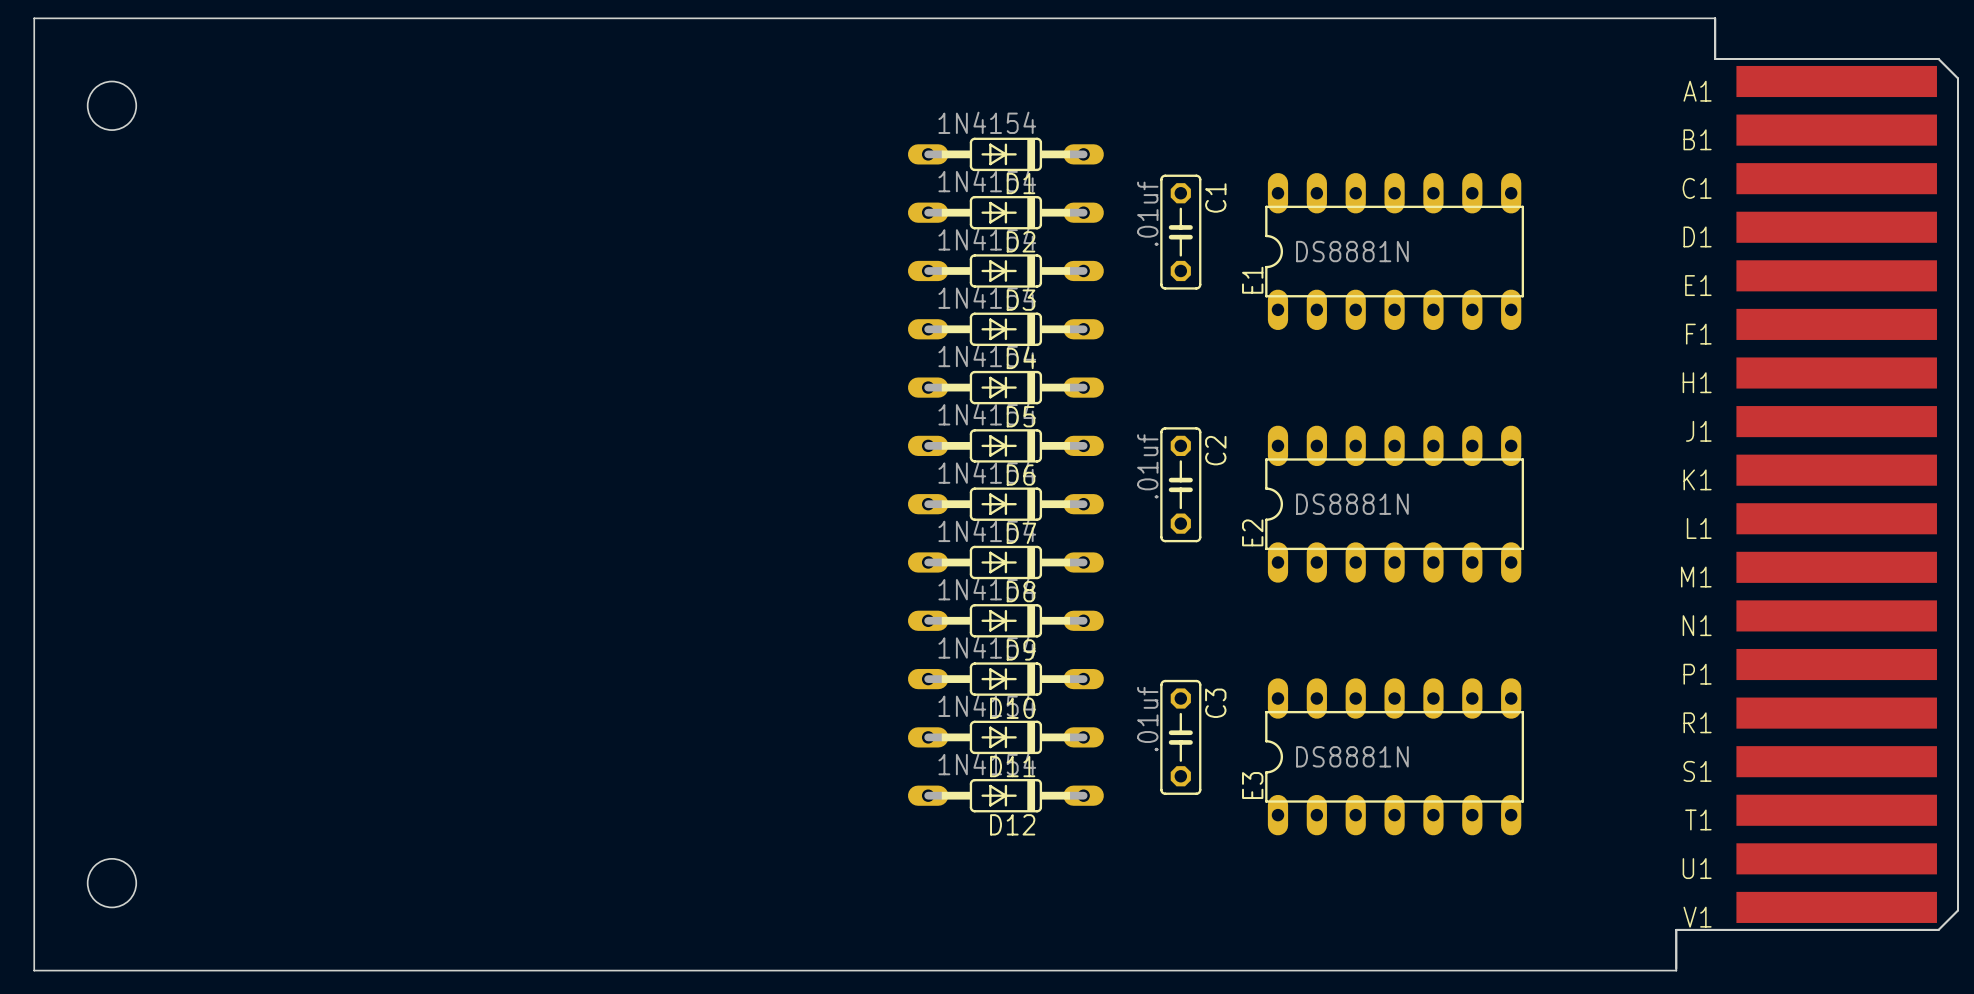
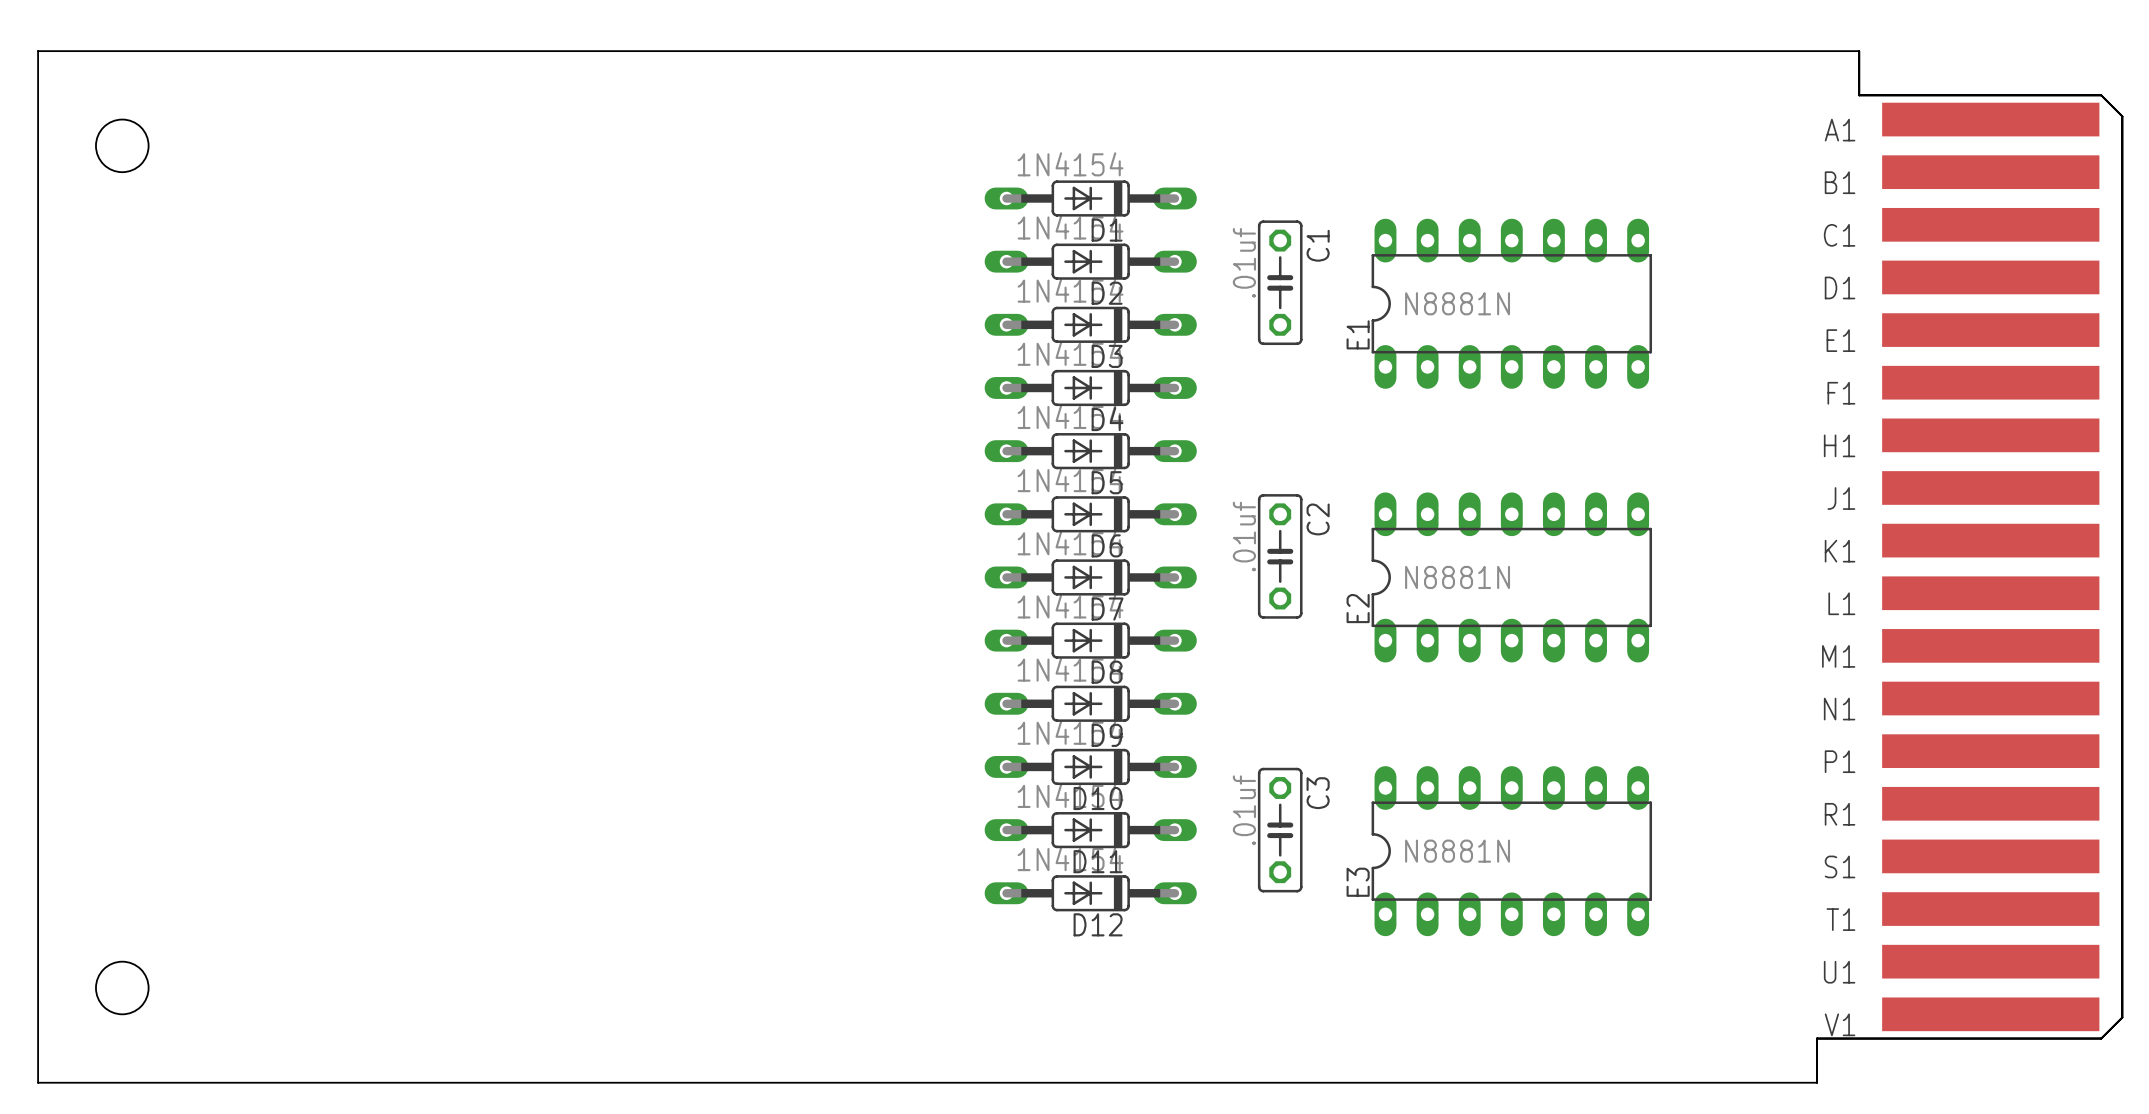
E1 value: DS8881N (1352, 251) -> N8881N (1457, 303)
E2 value: DS8881N (1352, 504) -> N8881N (1457, 577)
E3 value: DS8881N (1352, 756) -> N8881N (1457, 851)

